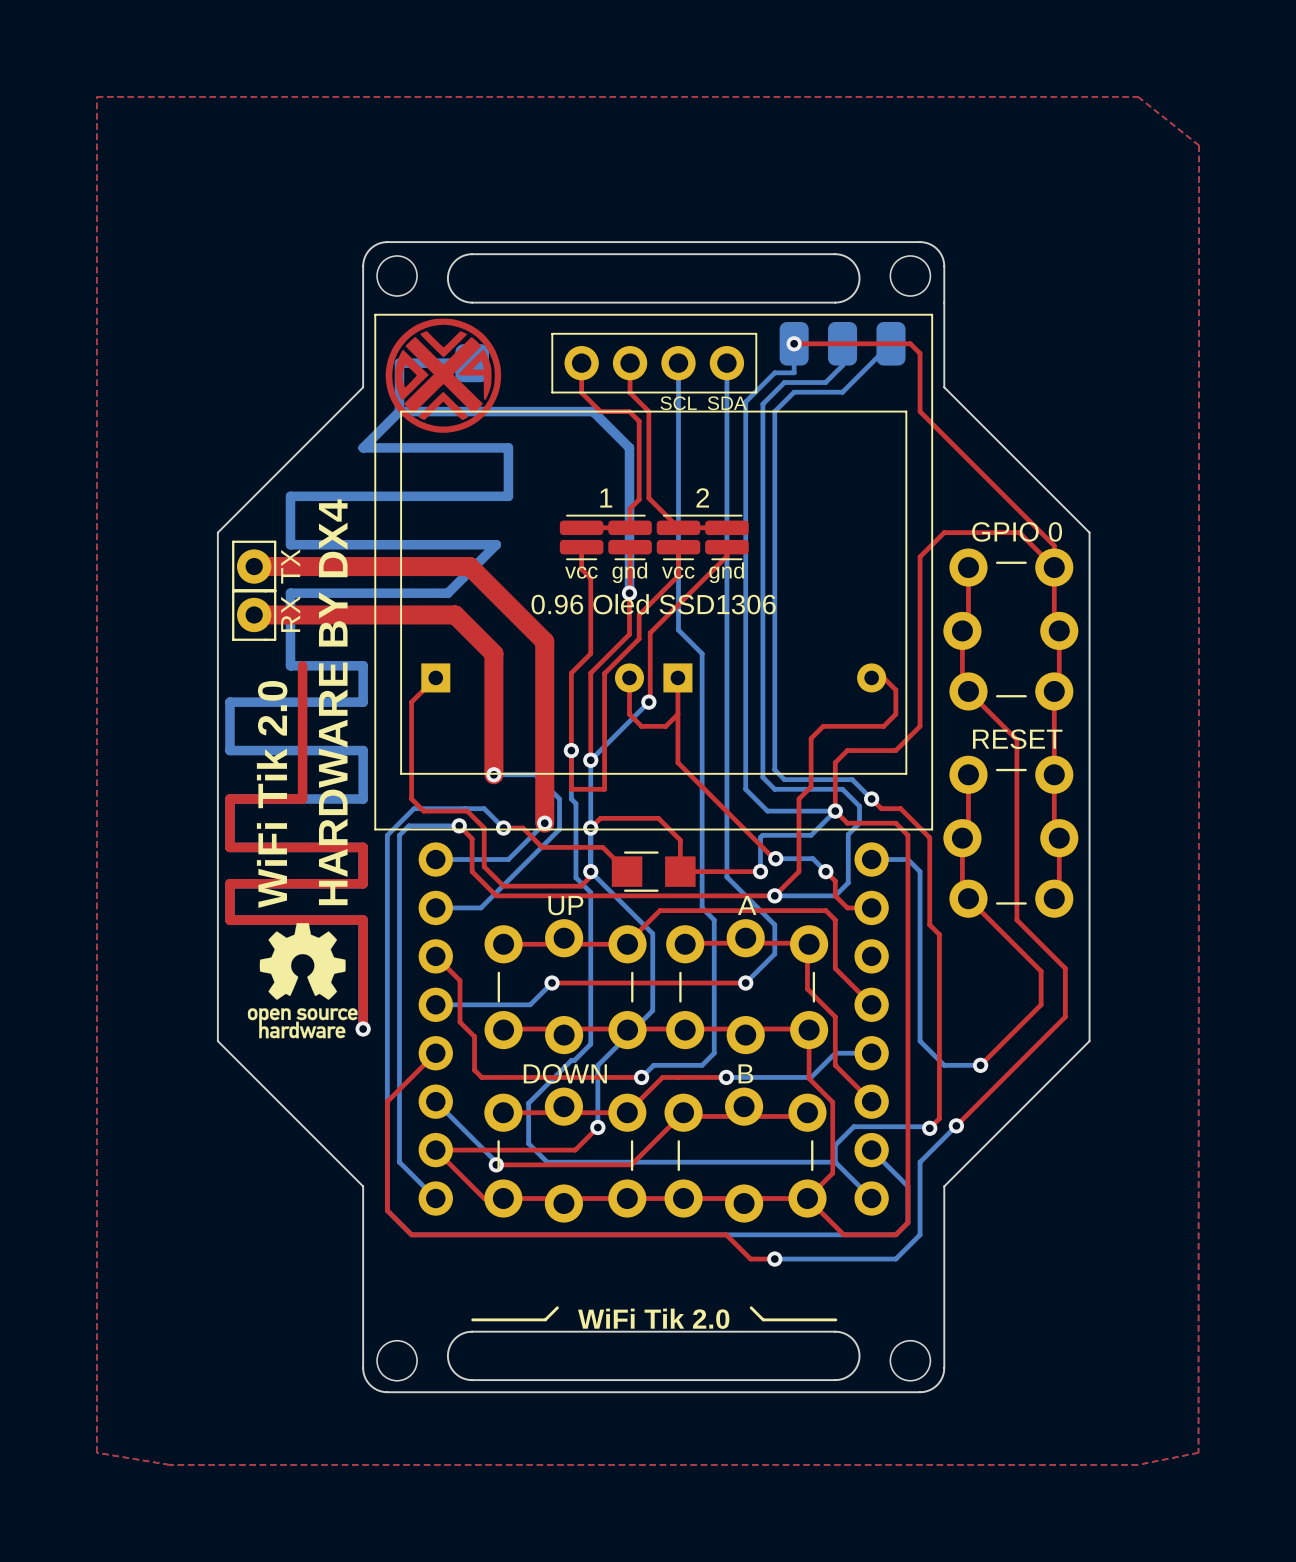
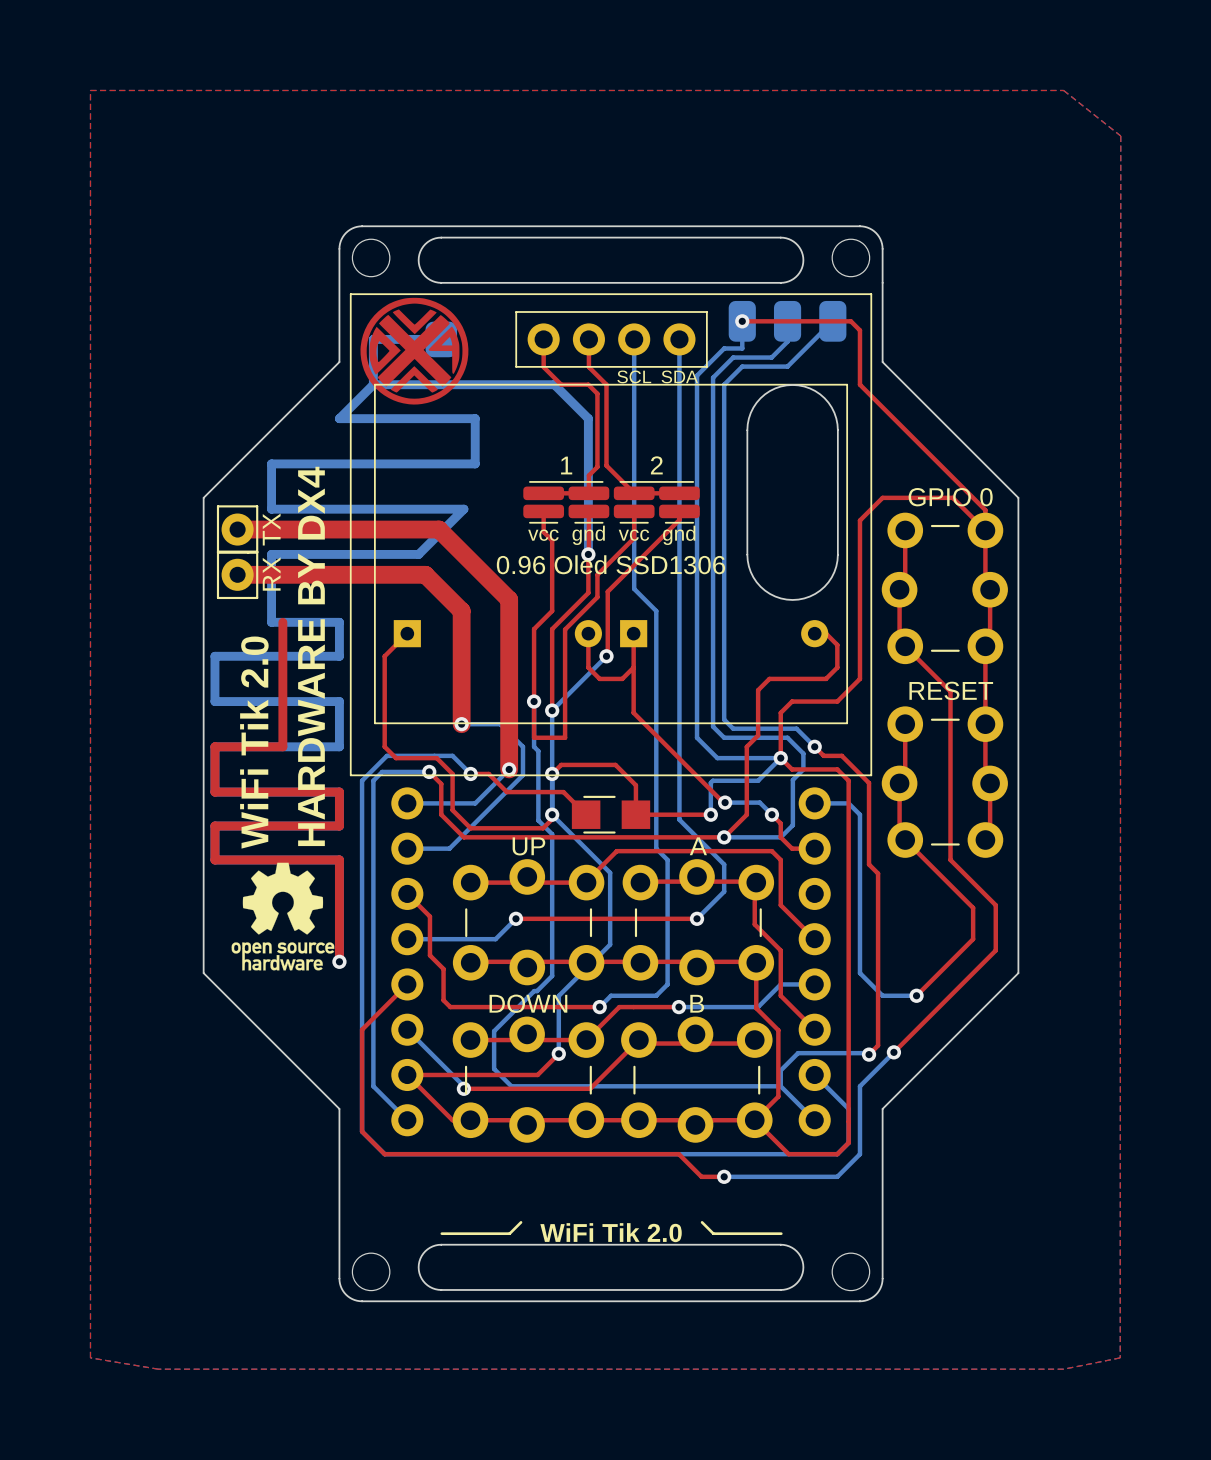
board edge: none -> (747, 430) (747, 554) (750, 572) (760, 586) (775, 596) (792, 599) (809, 596) (820, 590) (828, 582) (834, 572) (837, 560) (837, 430) (834, 412) (824, 398) (809, 388) (792, 384) (780, 386) (765, 394) (756, 402) (748, 418) (747, 430)

